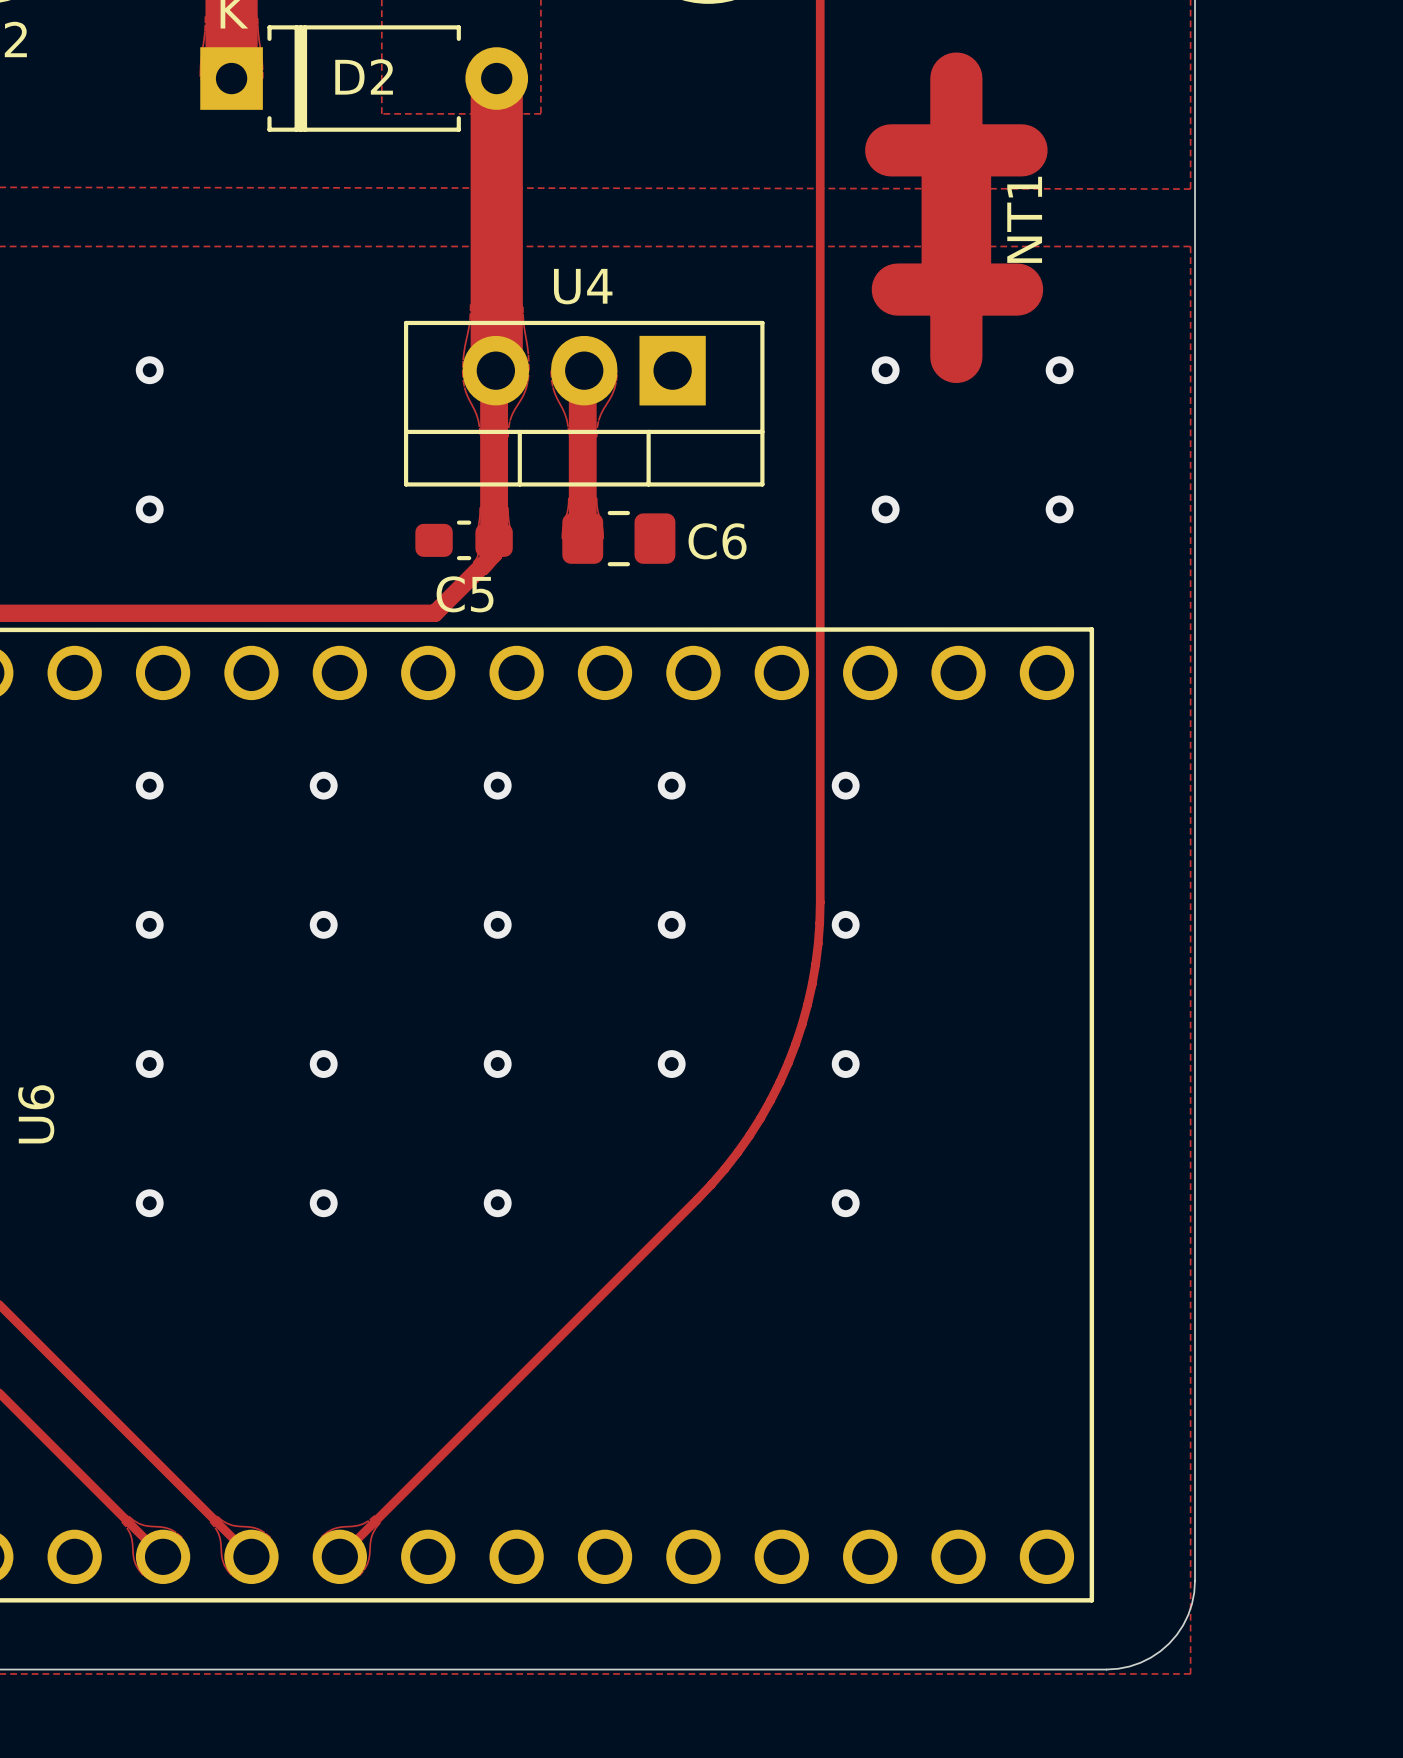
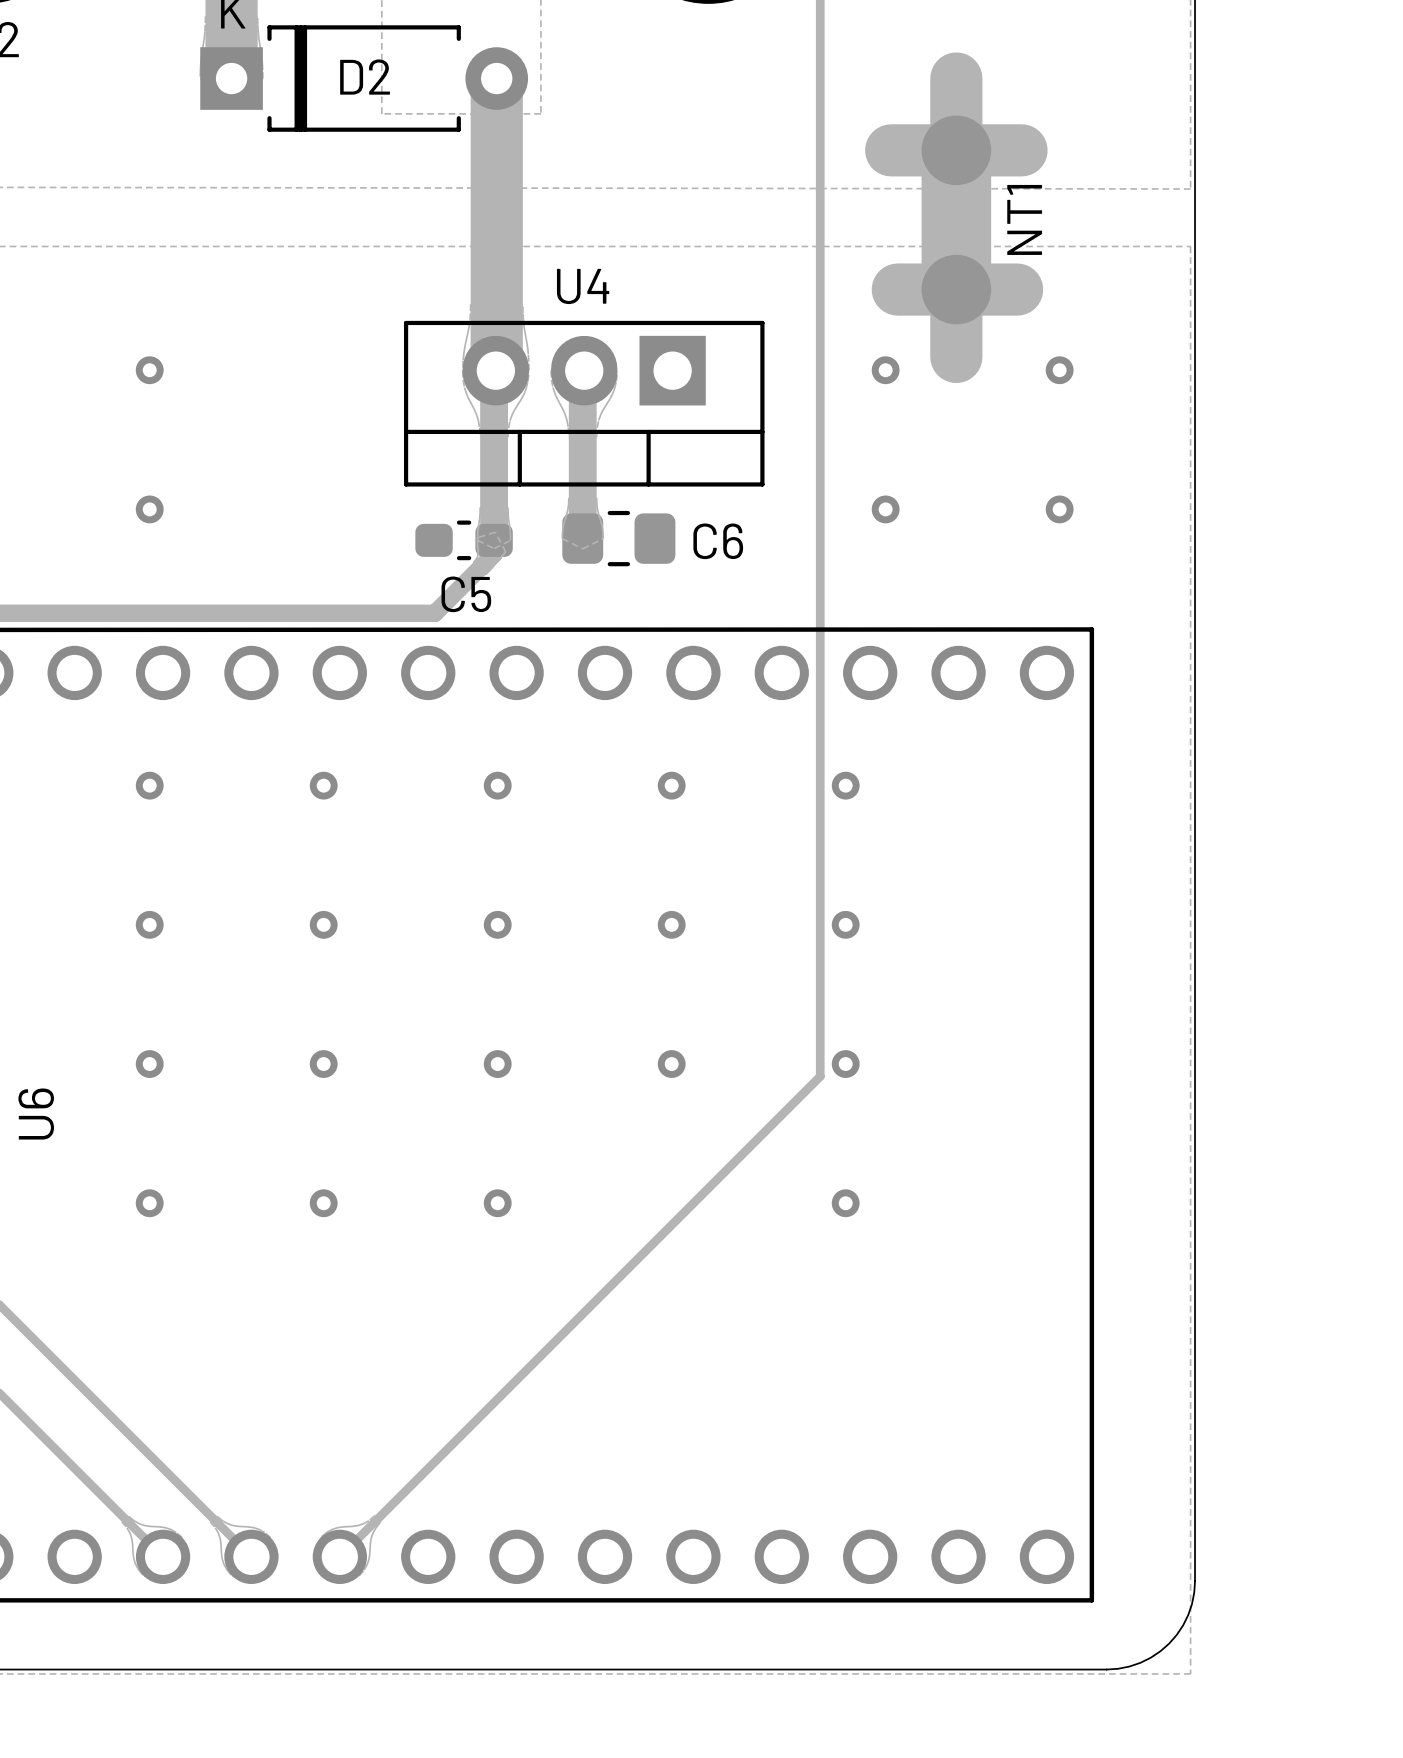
track: (820, 902) (818, 943) (812, 984) (802, 1024) (788, 1063) (770, 1100) (749, 1135) (724, 1168) (697, 1199) -> (820, 902) (820, 1076) (697, 1199)

